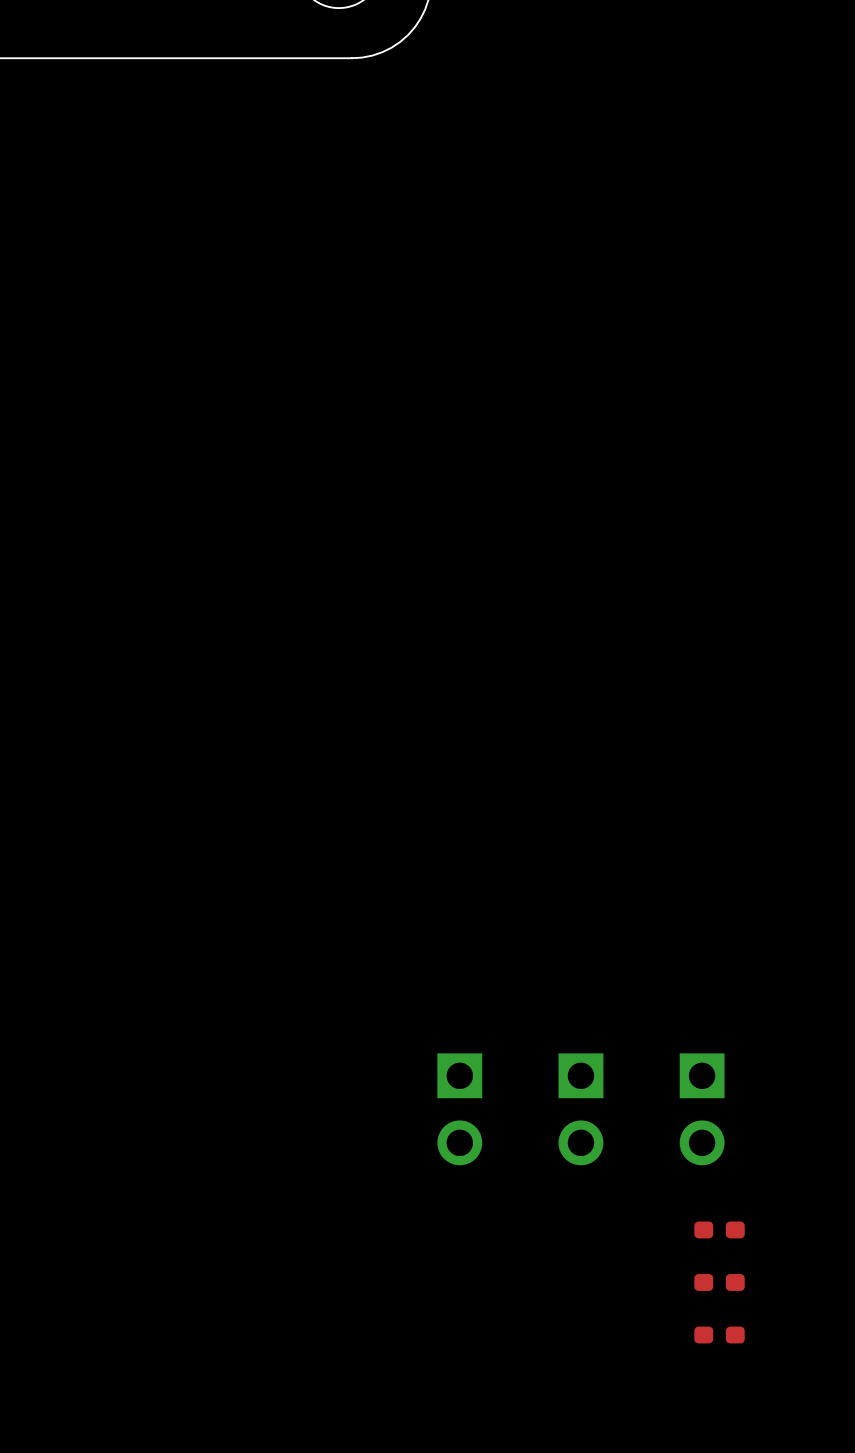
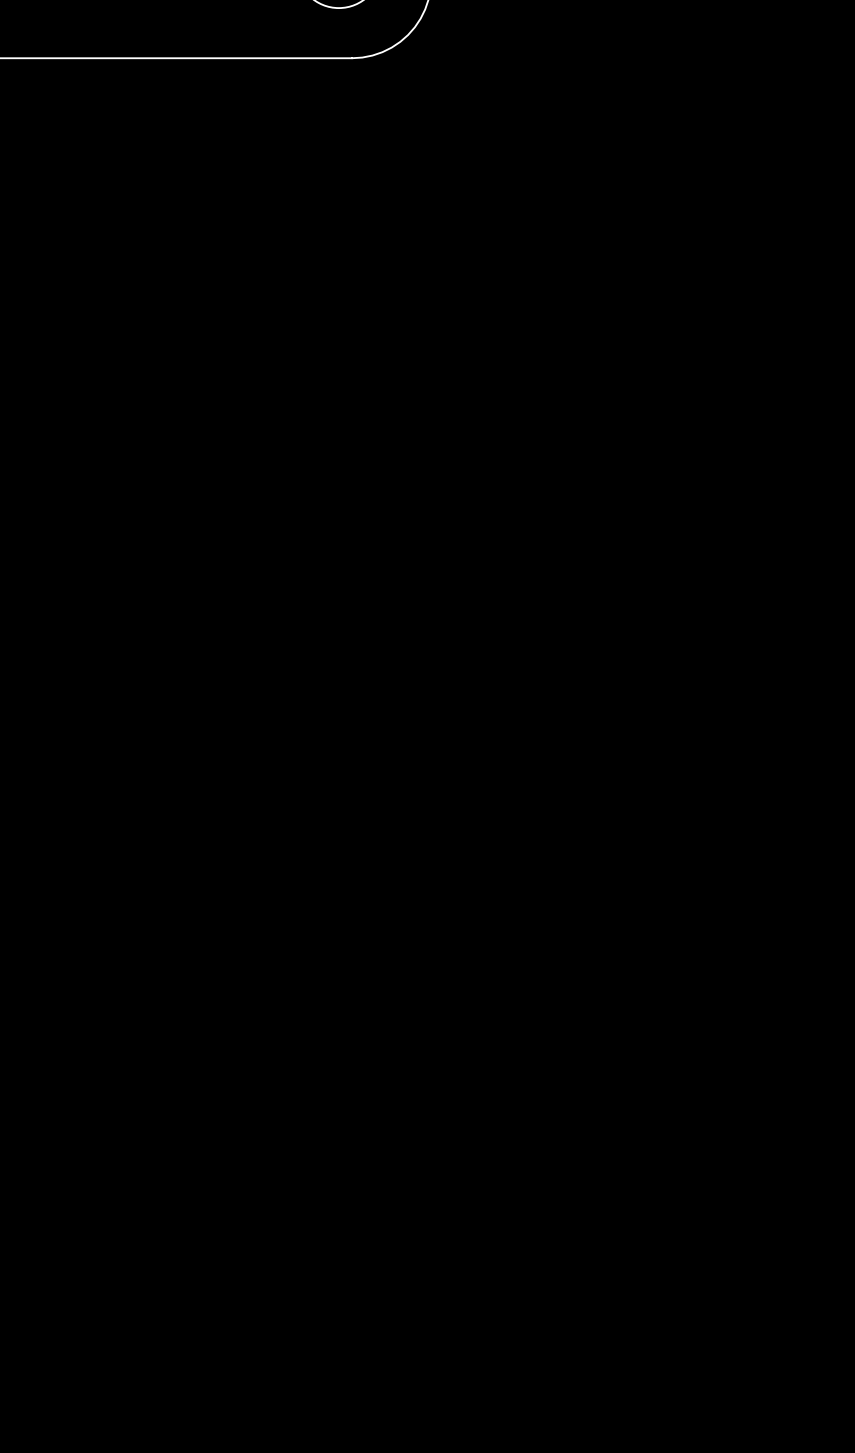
part: (459, 1109) -> none
part: (580, 1109) -> none
part: (702, 1109) -> none
part: (719, 1229) -> none
part: (719, 1282) -> none
part: (719, 1335) -> none

